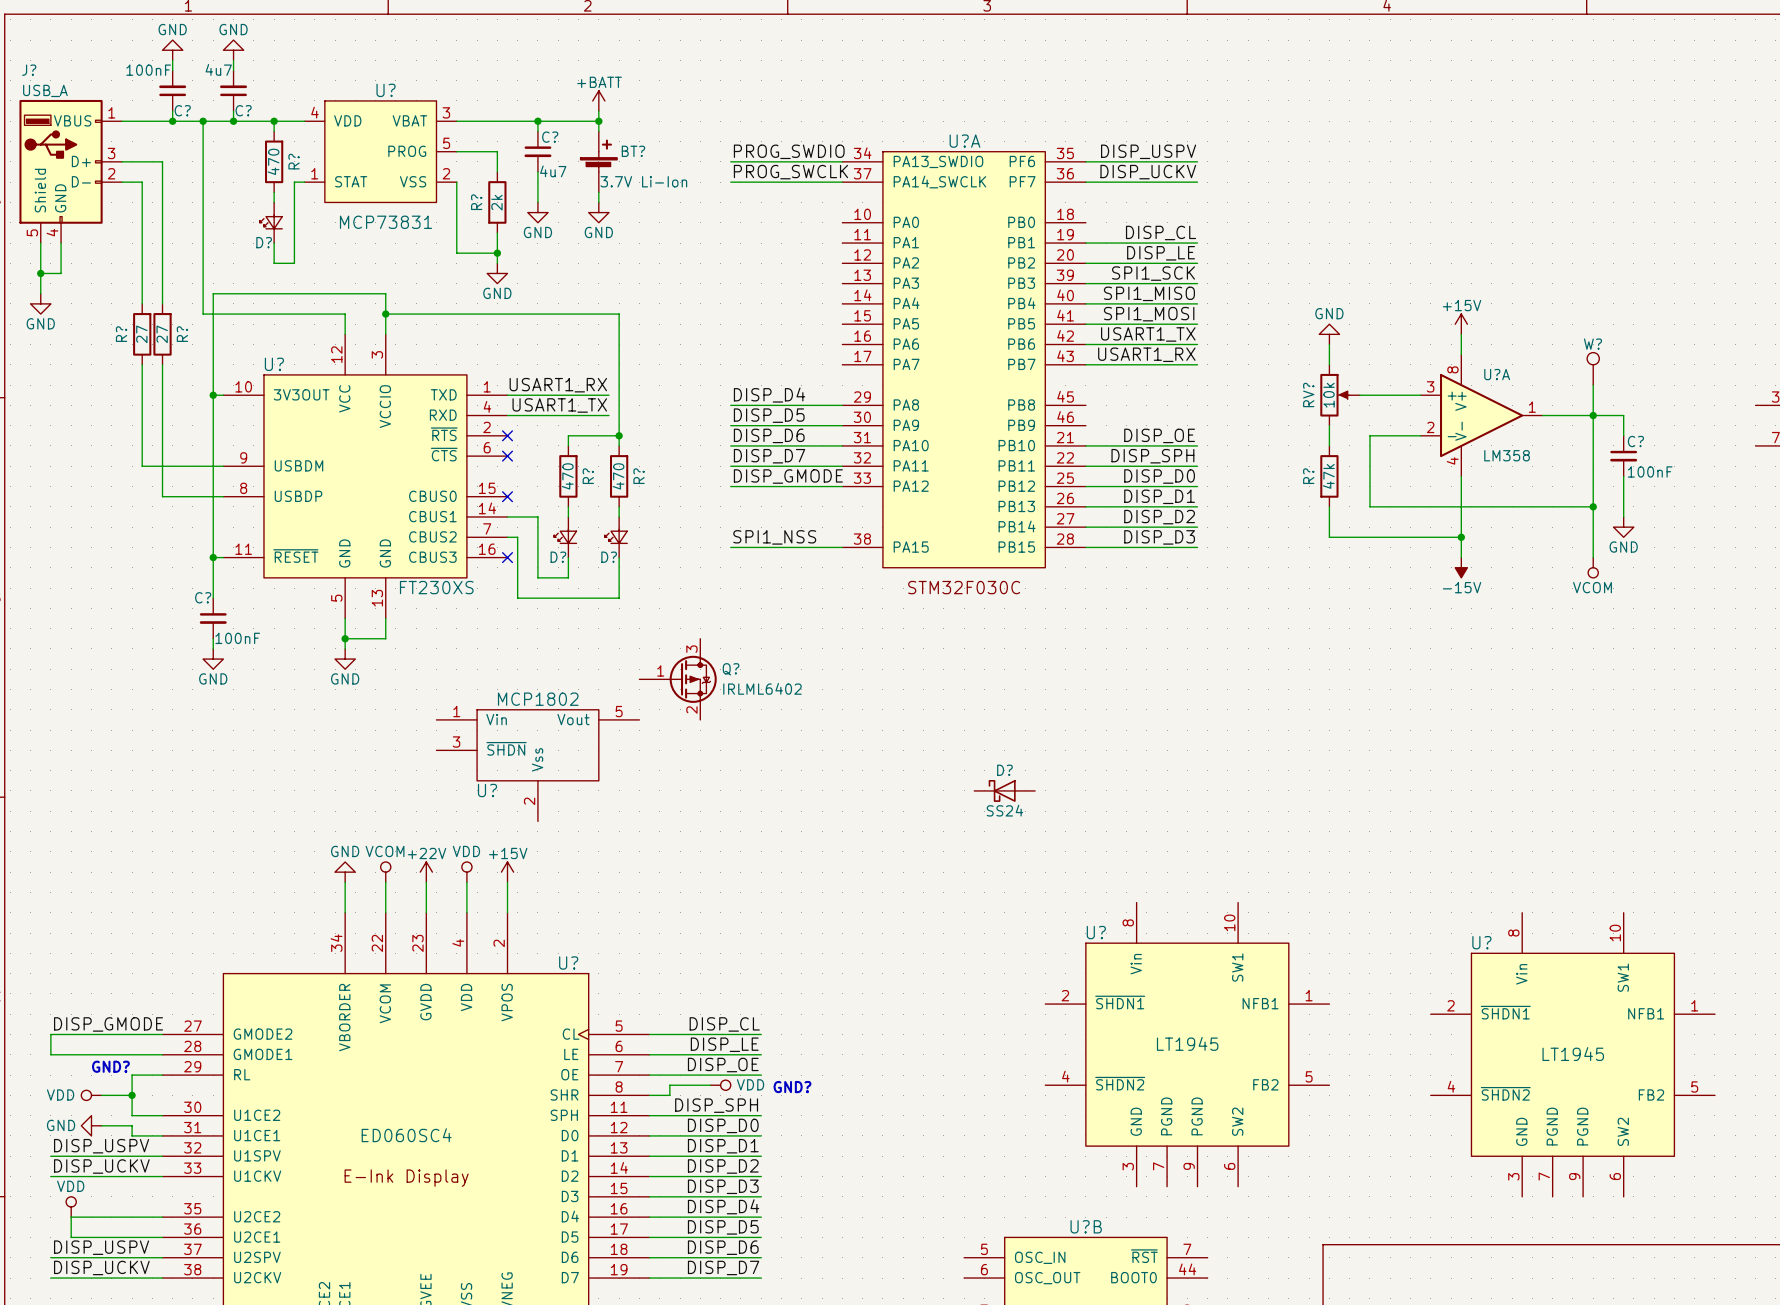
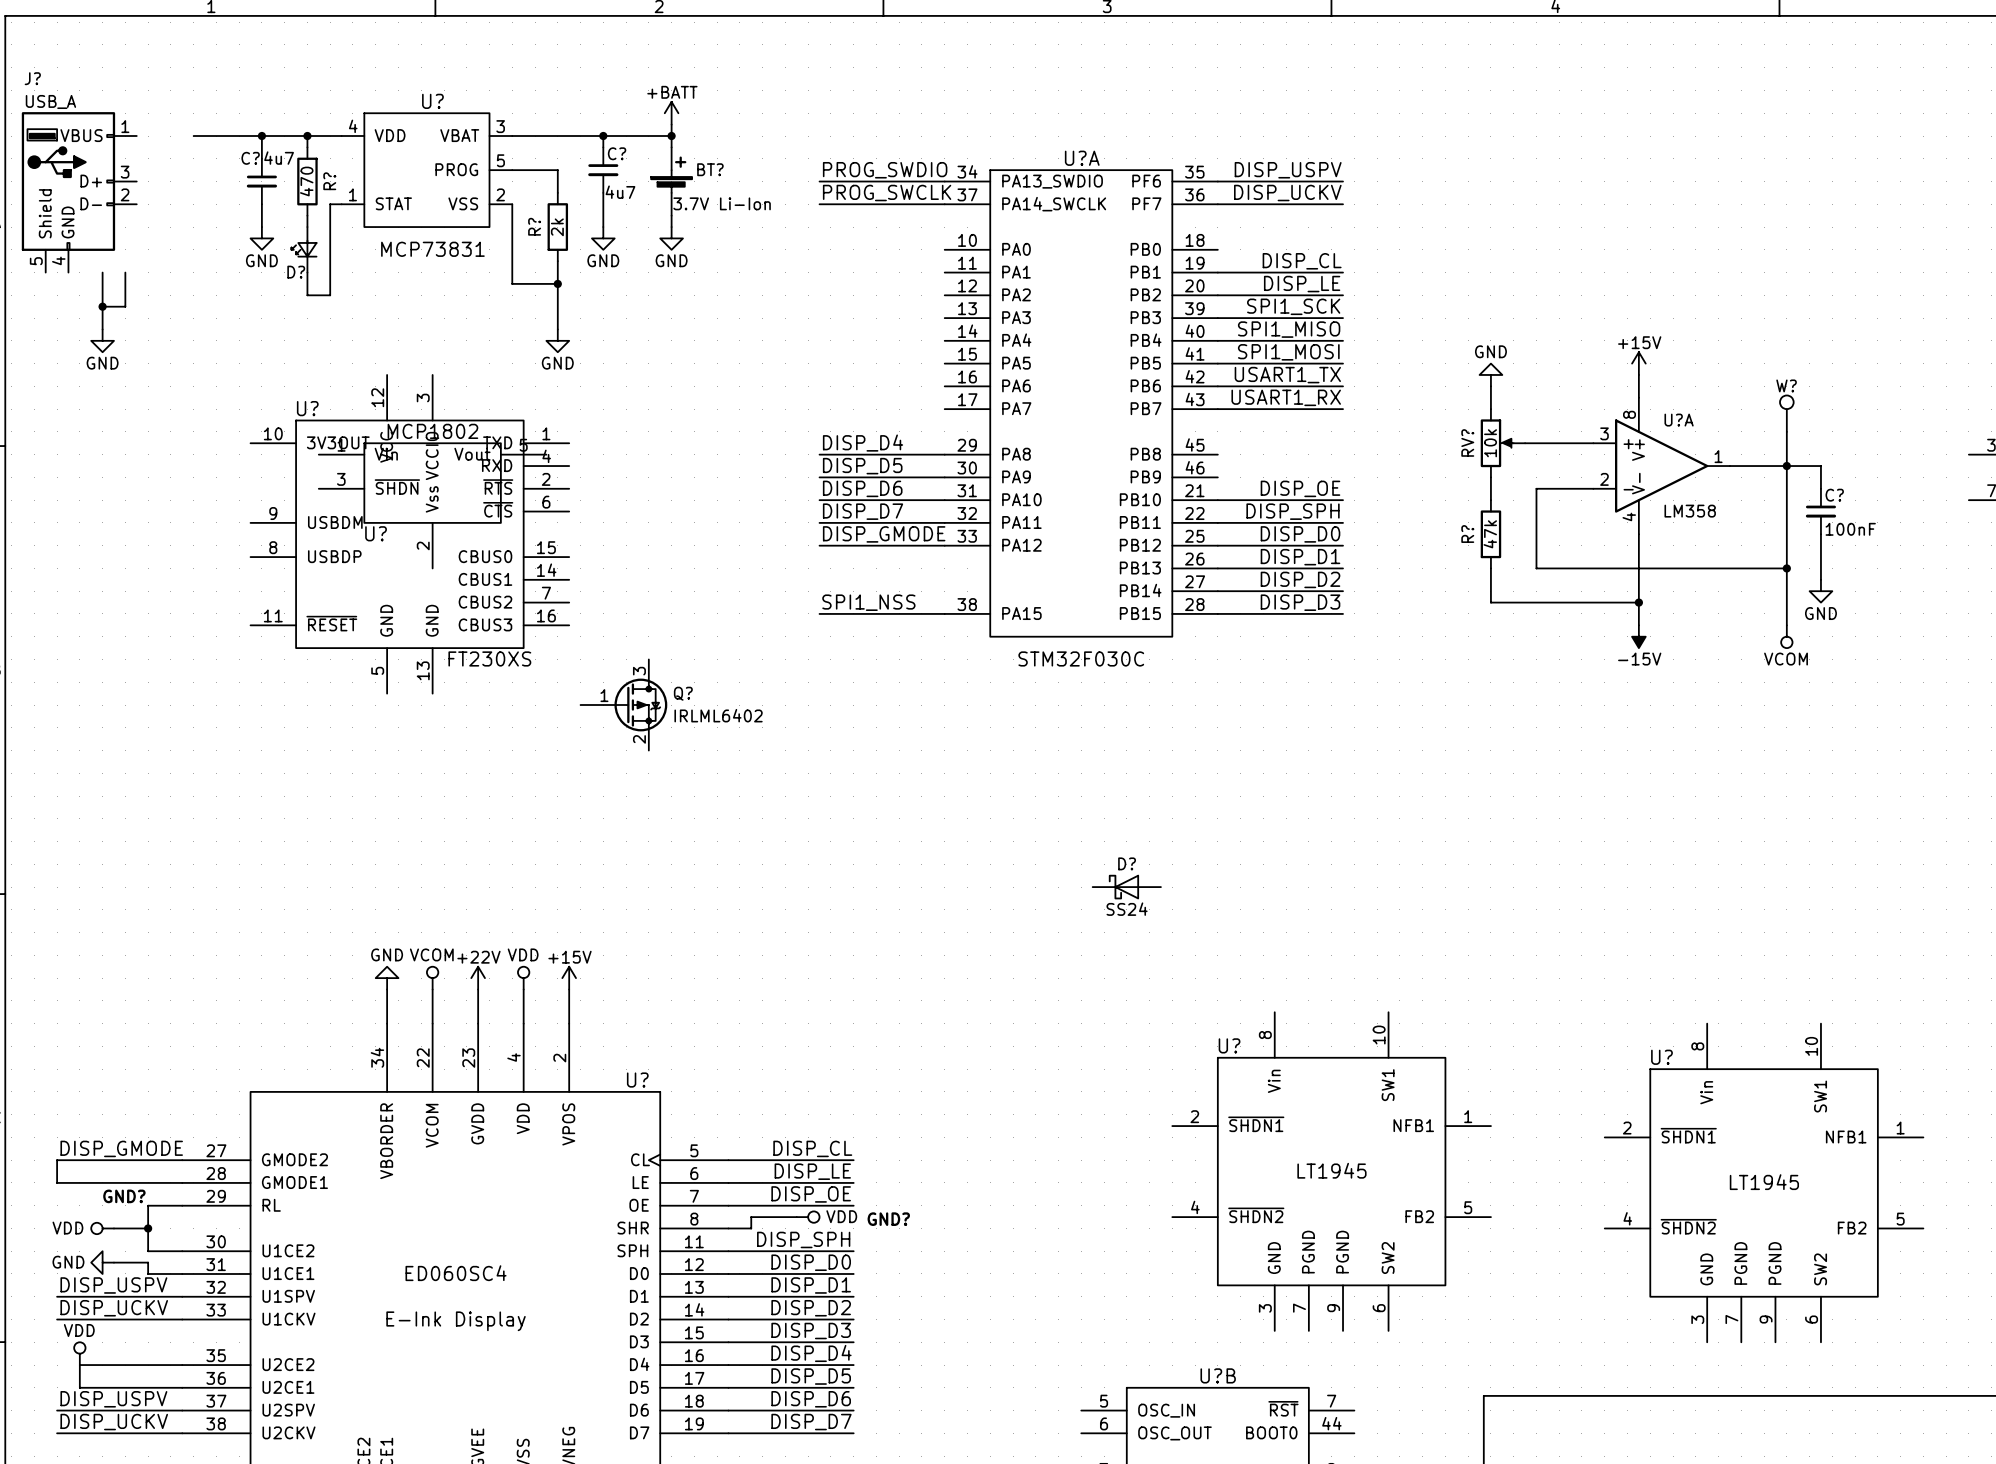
power symbol: GND (172, 50) -> none
power symbol: GND (233, 50) -> none
wire: (172, 60) (172, 70) -> none
wire: (233, 60) (233, 70) -> none
C? value position: 4u7 (218, 69) -> 4u7 (279, 158)
C?: 100nF (172, 90) -> none
C? rotation: 0° (233, 90) -> 180° (261, 181)
C? position: (233, 90) -> (261, 181)
wire: (172, 111) (172, 121) (121, 121) -> none
wire: (233, 111) (233, 121) -> (261, 158) (261, 136)
junction: (172, 121) -> none
wire: (203, 121) (203, 314) (345, 314) (345, 334) -> none
junction: (203, 121) -> none
wire: (121, 161) (162, 161) (162, 303) -> none
wire: (121, 182) (142, 182) (142, 303) -> none
wire: none -> (261, 204) (261, 227)
power symbol: none -> GND (261, 238)
wire: (40, 243) (40, 293) -> (102, 272) (102, 329)
wire: (61, 243) (61, 273) (40, 273) -> (125, 272) (125, 306) (102, 306)
wire: none -> (557, 295) (557, 329)
junction: (40, 273) -> none
junction: none -> (102, 306)
power symbol position: GND (497, 273) -> GND (557, 340)
power symbol position: GND (40, 303) -> GND (102, 340)
wire: (385, 314) (619, 314) (619, 445) -> none
junction: (385, 314) -> none
R?: 27 (142, 334) -> none
R?: 27 (162, 334) -> none
wire: (385, 334) (385, 293) (213, 293) (213, 598) -> none
wire: (142, 364) (142, 466) (223, 466) -> none
wire: (162, 364) (162, 496) (223, 496) -> none
label: USART1_RX (558, 385) -> none
wire: (213, 395) (223, 395) -> none
junction: (213, 395) -> none
wire: (507, 395) (608, 395) -> none
label: USART1_TX (559, 405) -> none
wire: (507, 415) (608, 415) -> none
no-connect mark: (507, 435) -> none
wire: (619, 435) (568, 435) (568, 445) -> none
junction: (619, 435) -> none
U?: none -> MCP1802 (432, 505)
no-connect mark: (507, 456) -> none
R?: 470 (568, 476) -> none
R?: 470 (619, 476) -> none
no-connect mark: (507, 496) -> none
wire: (568, 506) (568, 516) -> none
wire: (619, 506) (619, 516) -> none
wire: (507, 516) (537, 516) (537, 577) (568, 577) (568, 557) -> none
wire: (507, 537) (517, 537) (517, 598) (619, 598) (619, 557) -> none
D?: (565, 537) -> none
D?: (616, 537) -> none
wire: (213, 557) (223, 557) -> none
junction: (213, 557) -> none
no-connect mark: (507, 557) -> none
C?: 100nF (213, 618) -> none
wire: (345, 618) (345, 648) -> none
wire: (385, 618) (385, 638) (345, 638) -> none
wire: (213, 638) (213, 648) -> none
junction: (345, 638) -> none
power symbol: GND (213, 659) -> none
power symbol: GND (345, 659) -> none
Q? position: (678, 679) -> (623, 705)
U?: MCP1802 (537, 765) -> none

